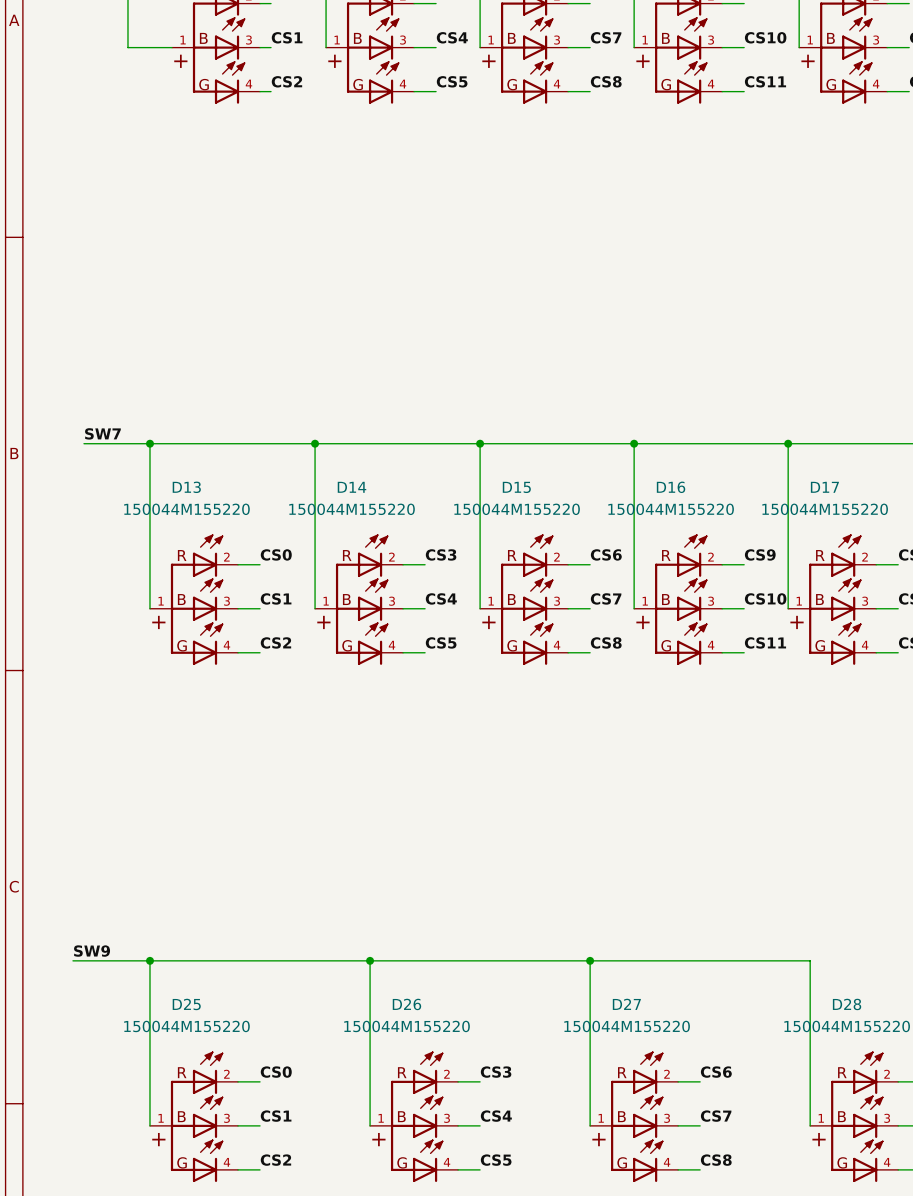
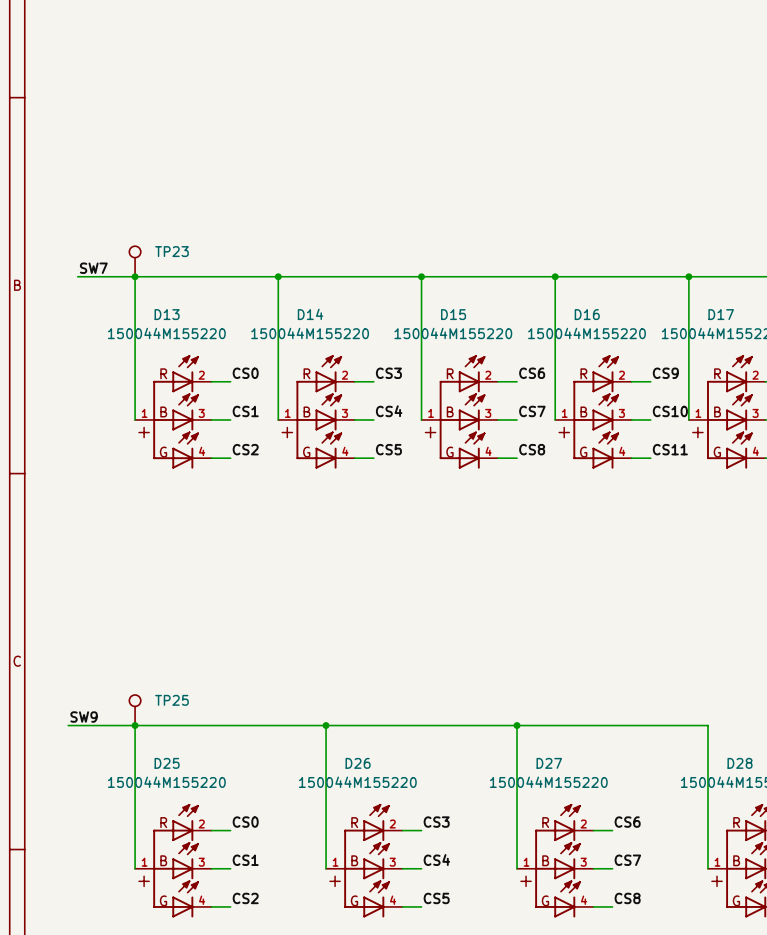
TP23: none -> (135, 261)
TP25: none -> (135, 710)

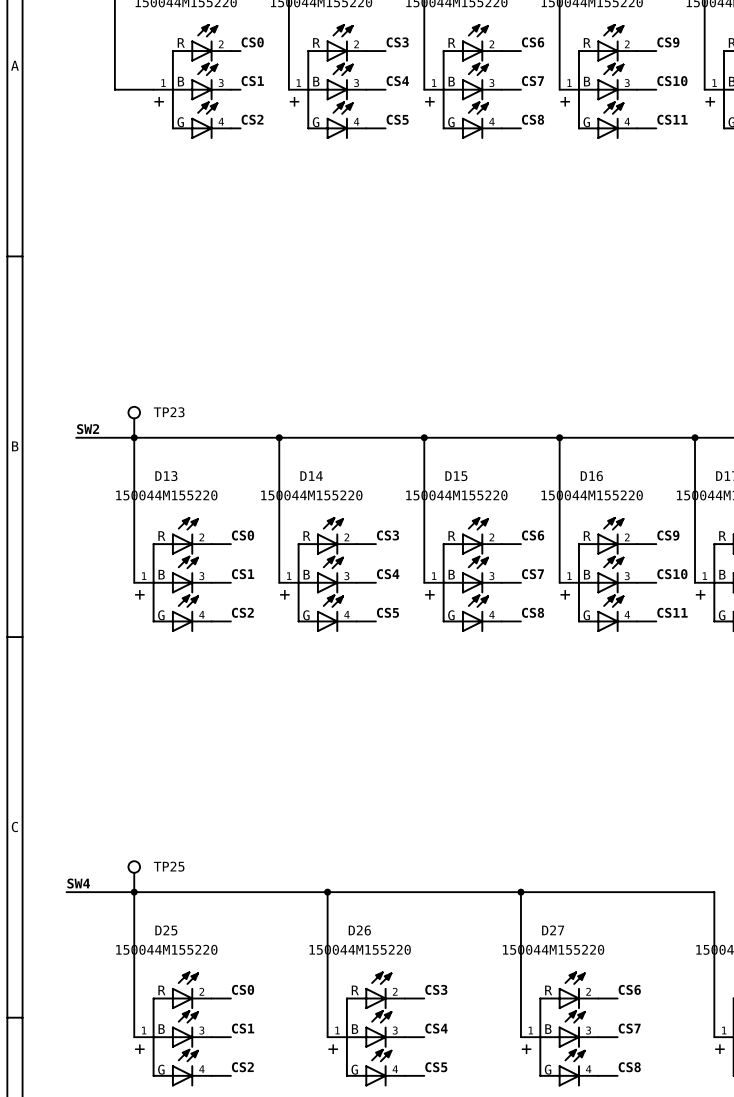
label: SW7 (93, 268) -> SW2 (88, 429)
label: SW9 (84, 717) -> SW4 (78, 883)

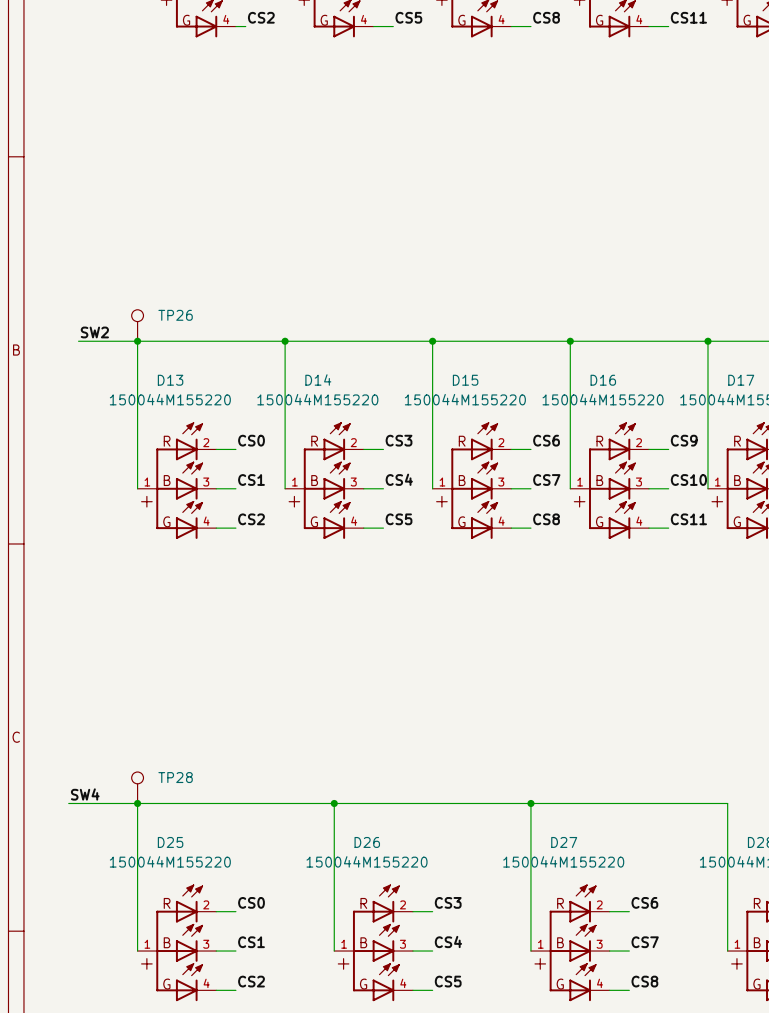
TP23 name: TP23 (169, 412) -> TP26 (175, 315)
TP25 name: TP25 (169, 866) -> TP28 (175, 777)

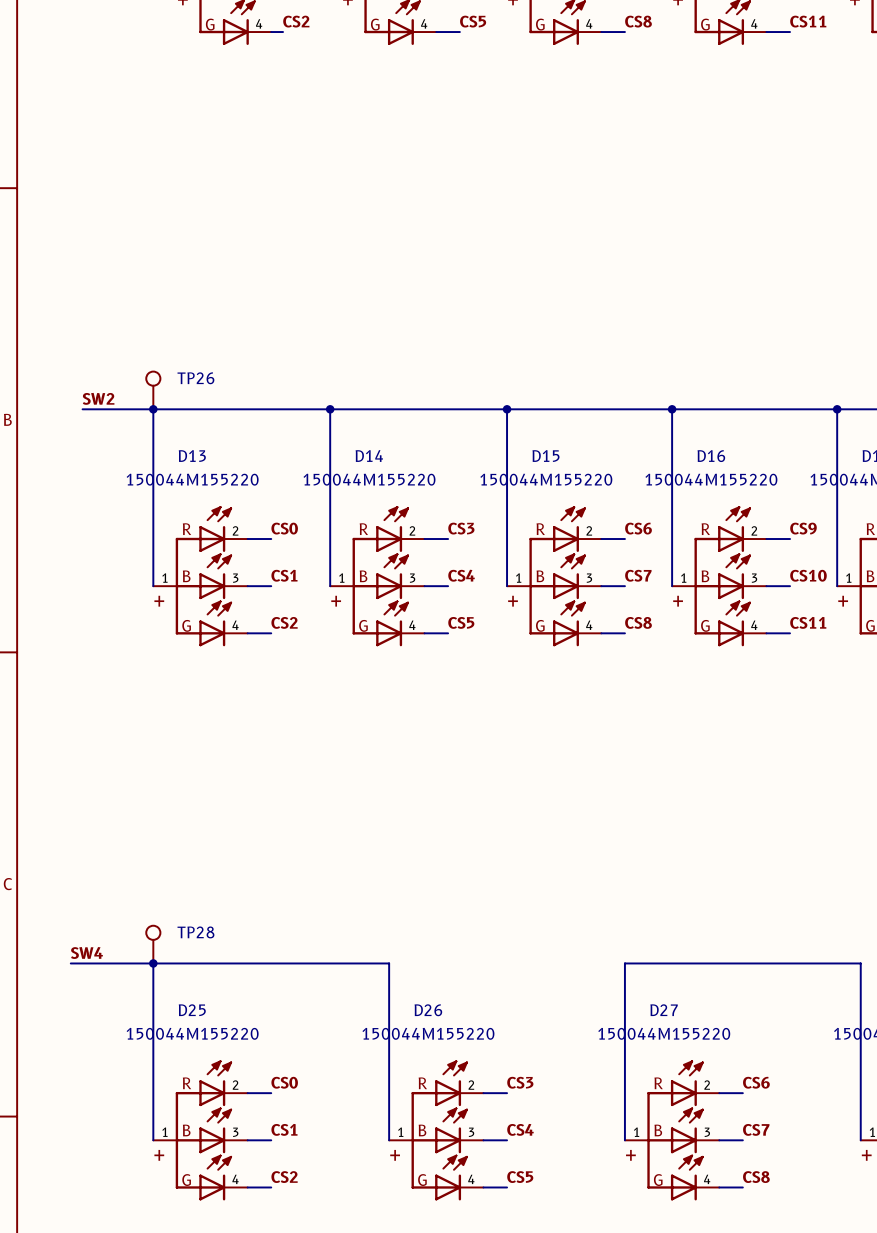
wire: (334, 803) (530, 803) -> none
junction: (334, 803) -> none
junction: (530, 803) -> none

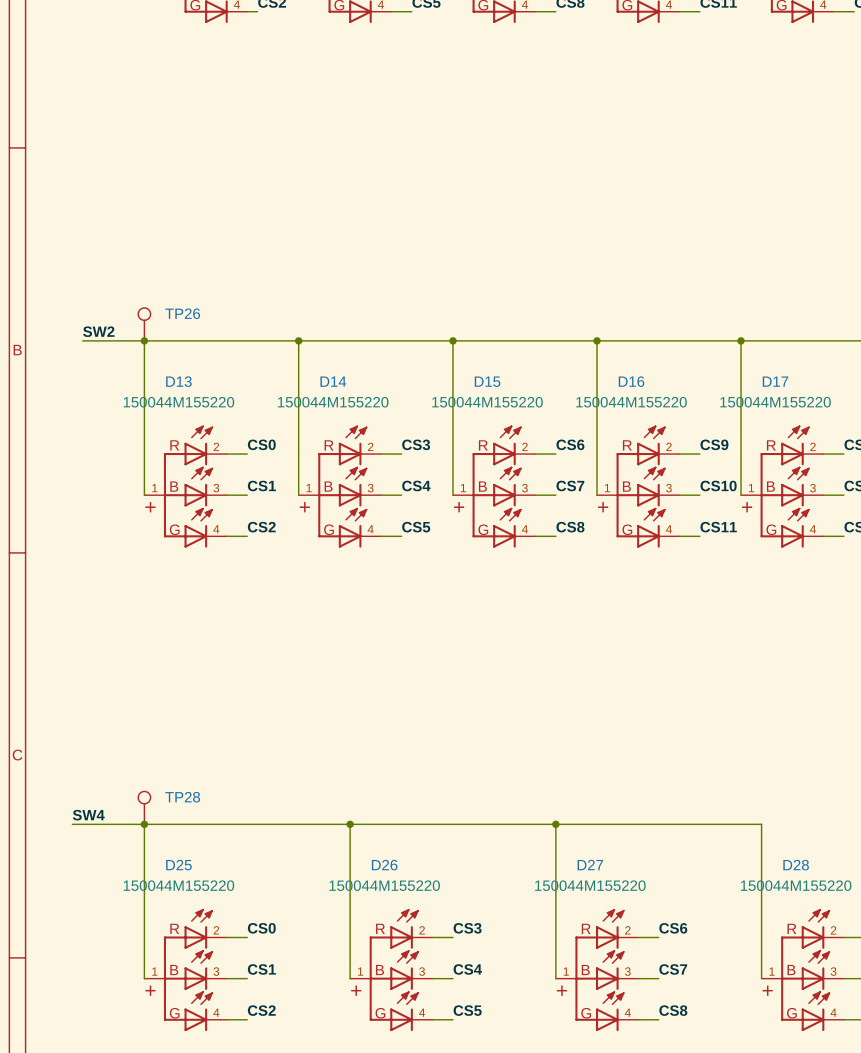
wire: none -> (350, 824) (555, 824)
junction: none -> (350, 824)
junction: none -> (555, 824)

